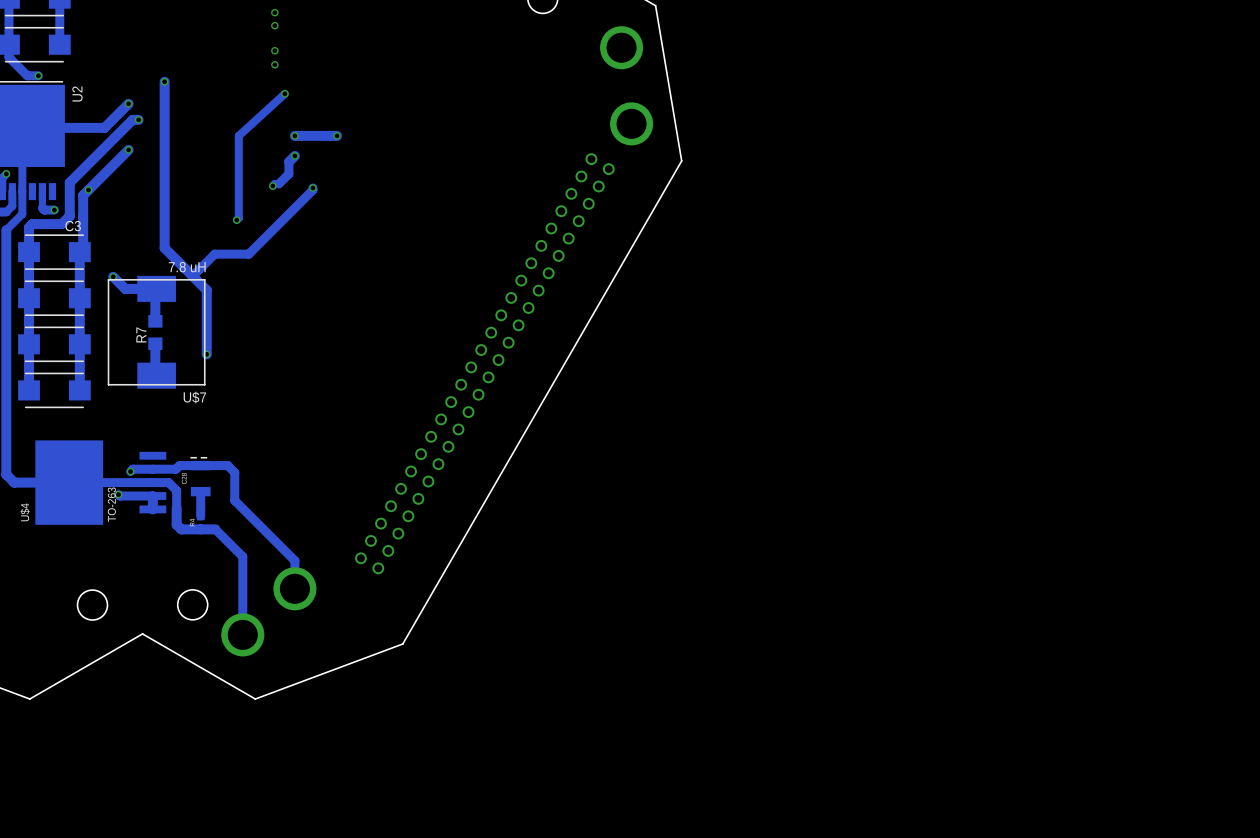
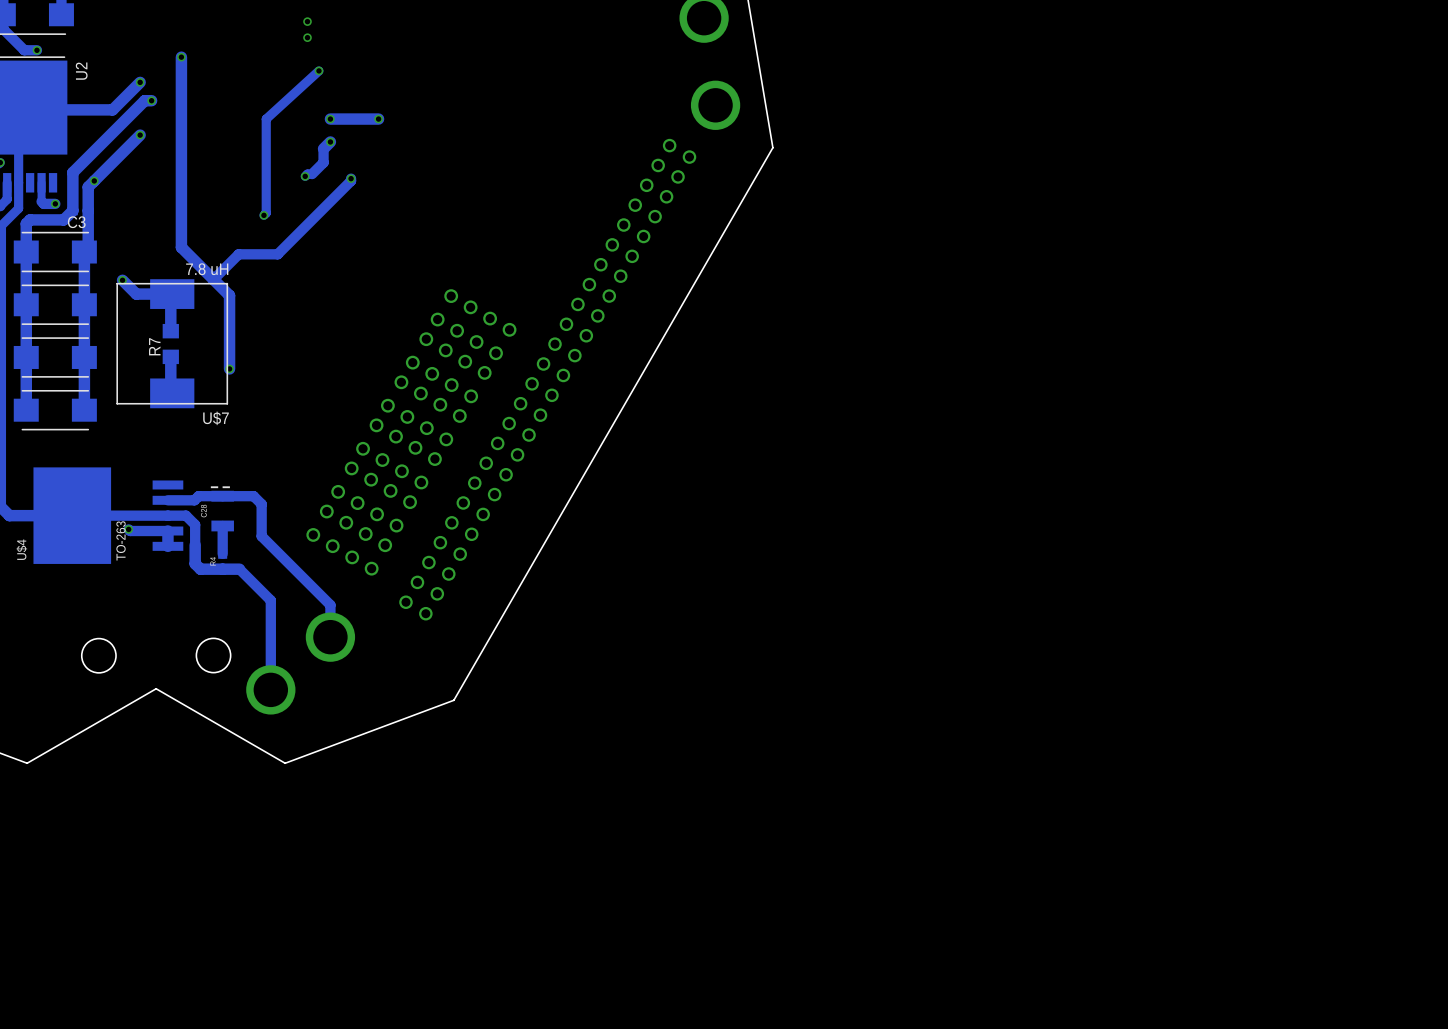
part: none -> (411, 432)
track: (152, 469) (132, 469) (130, 471) -> none
via: (130, 471) -> none

